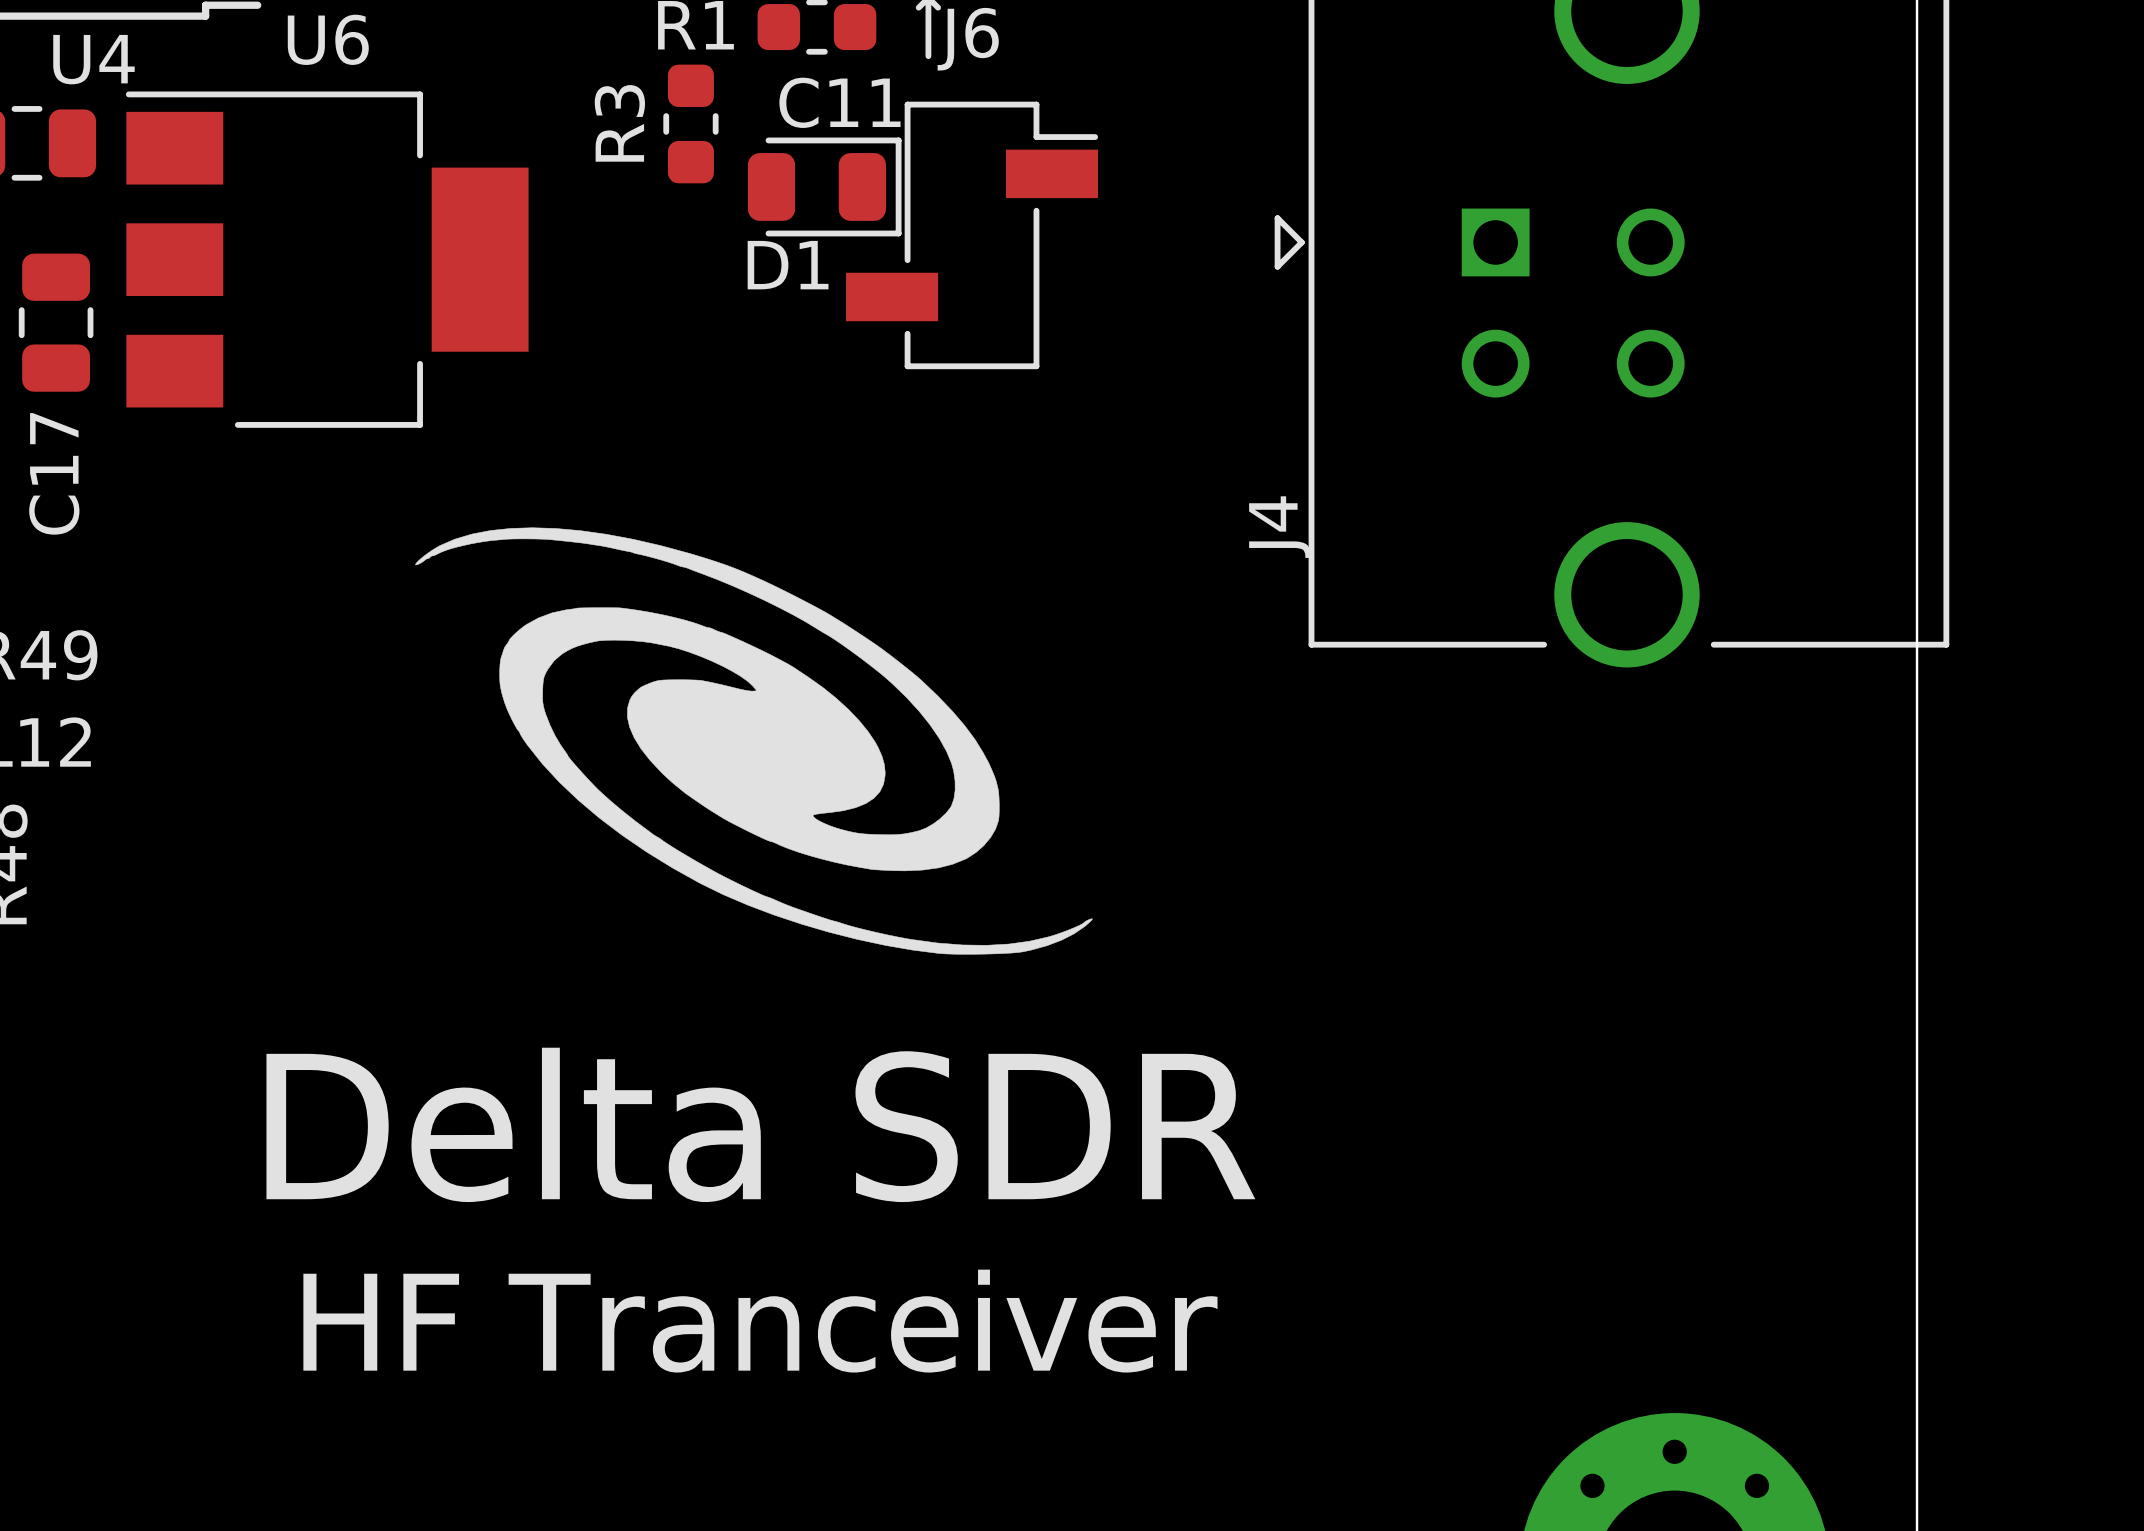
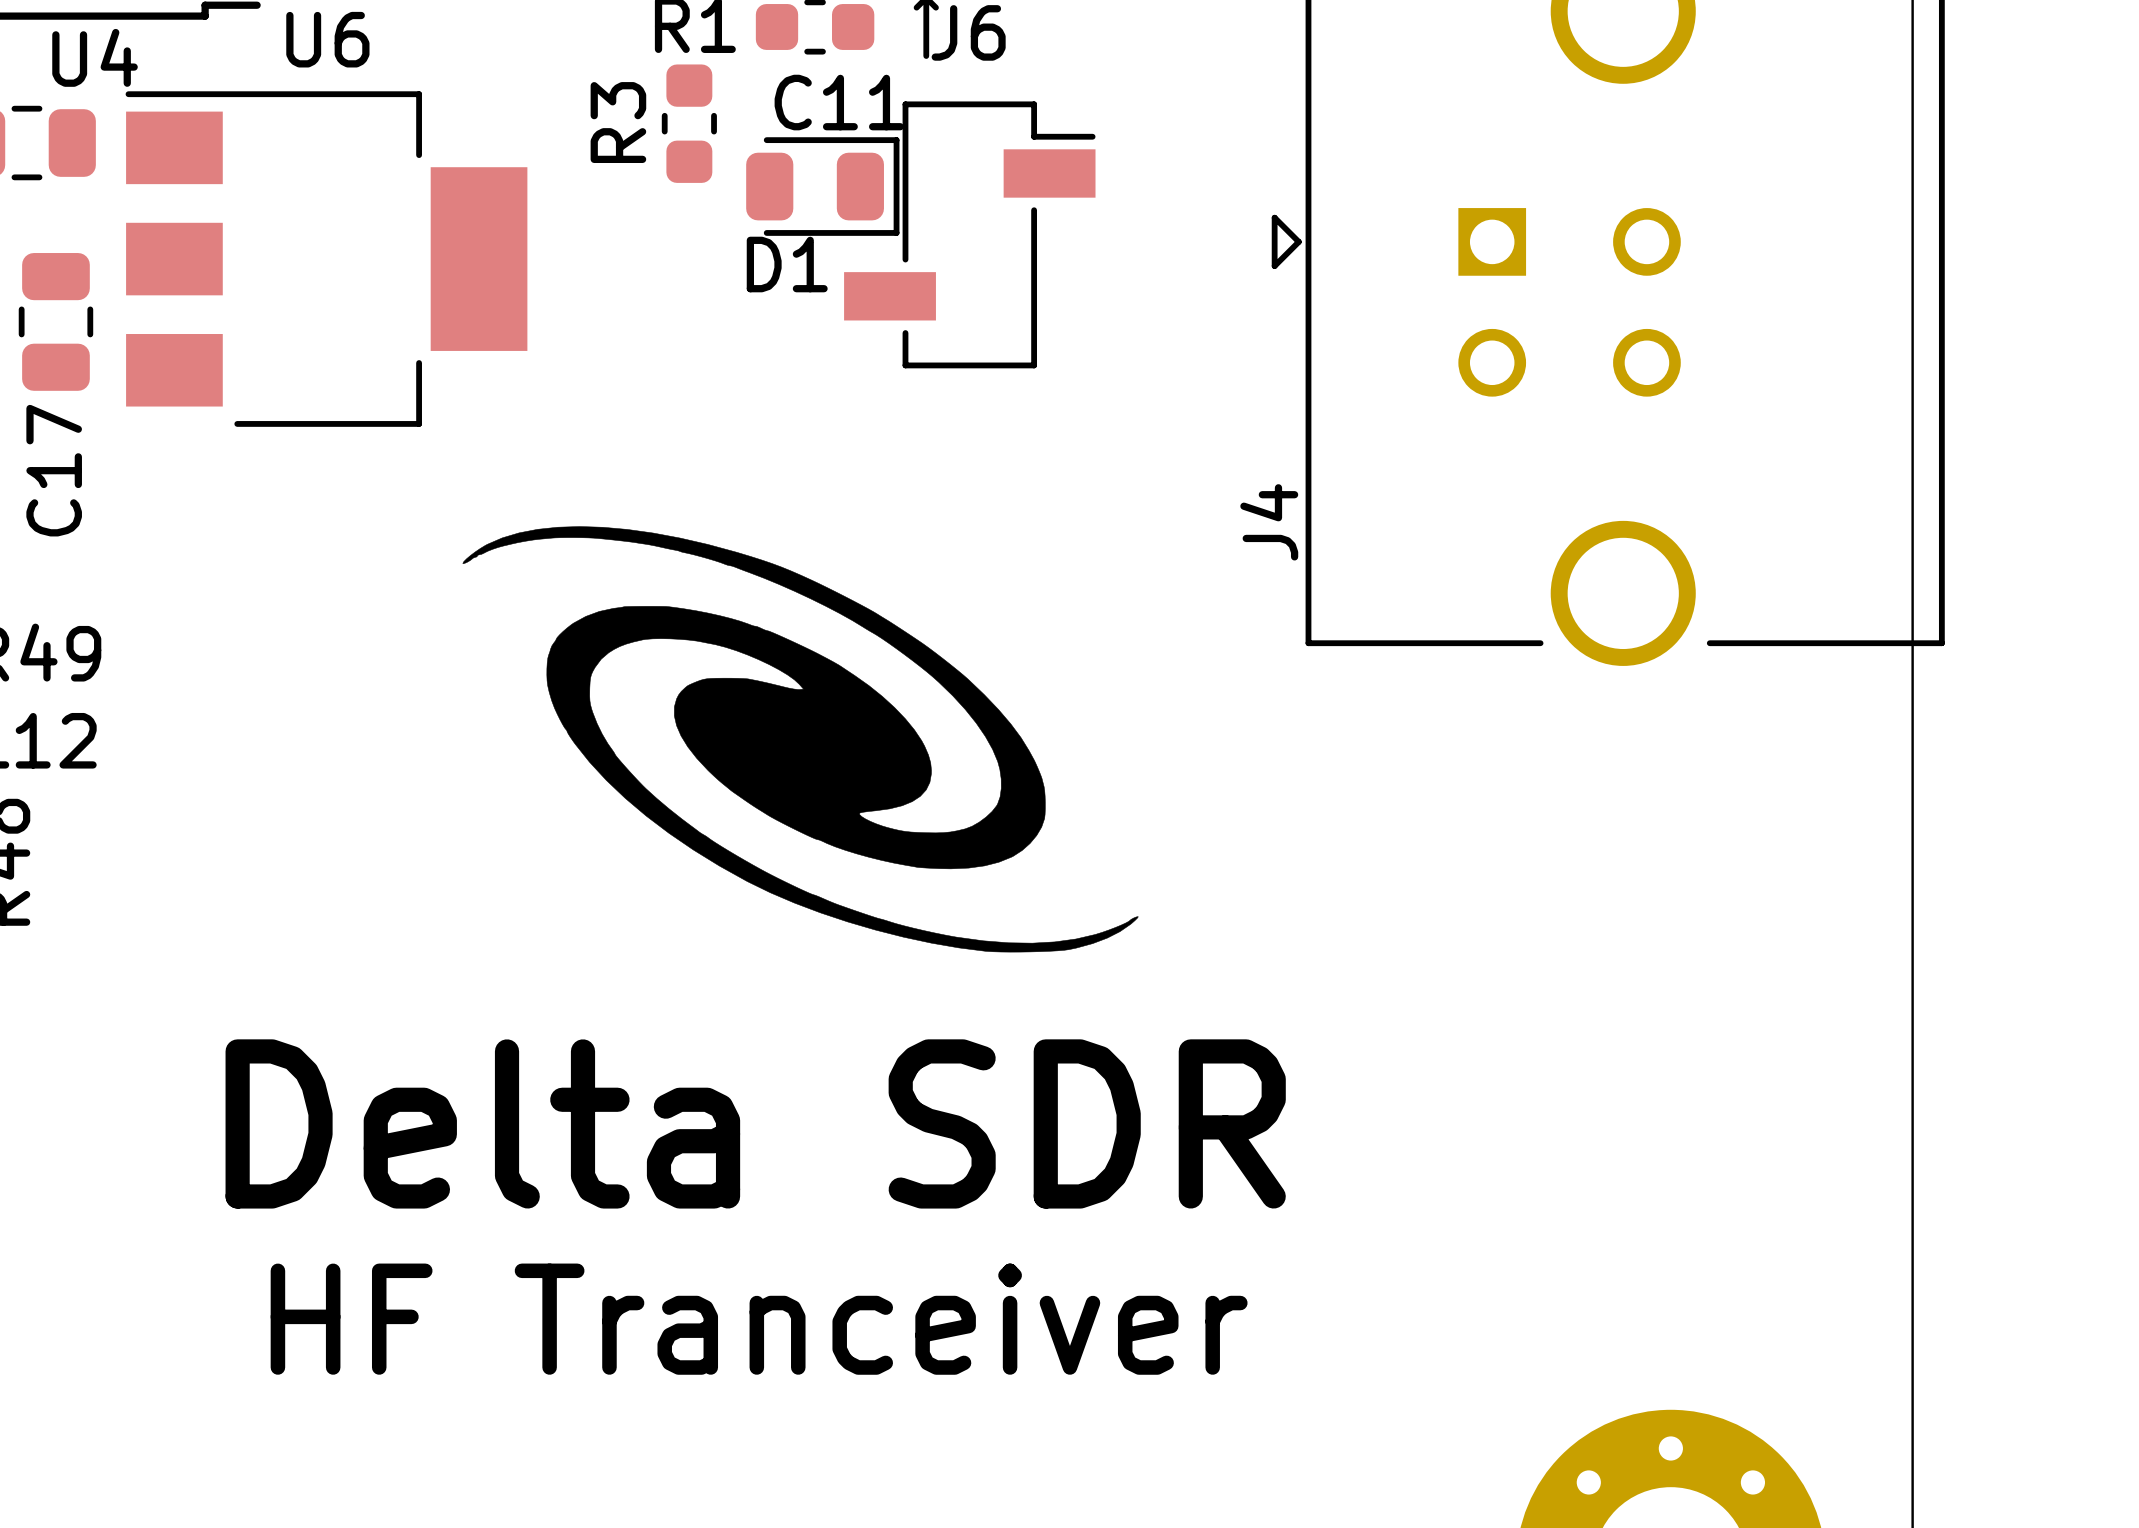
drawing position: (753, 741) -> (800, 739)

